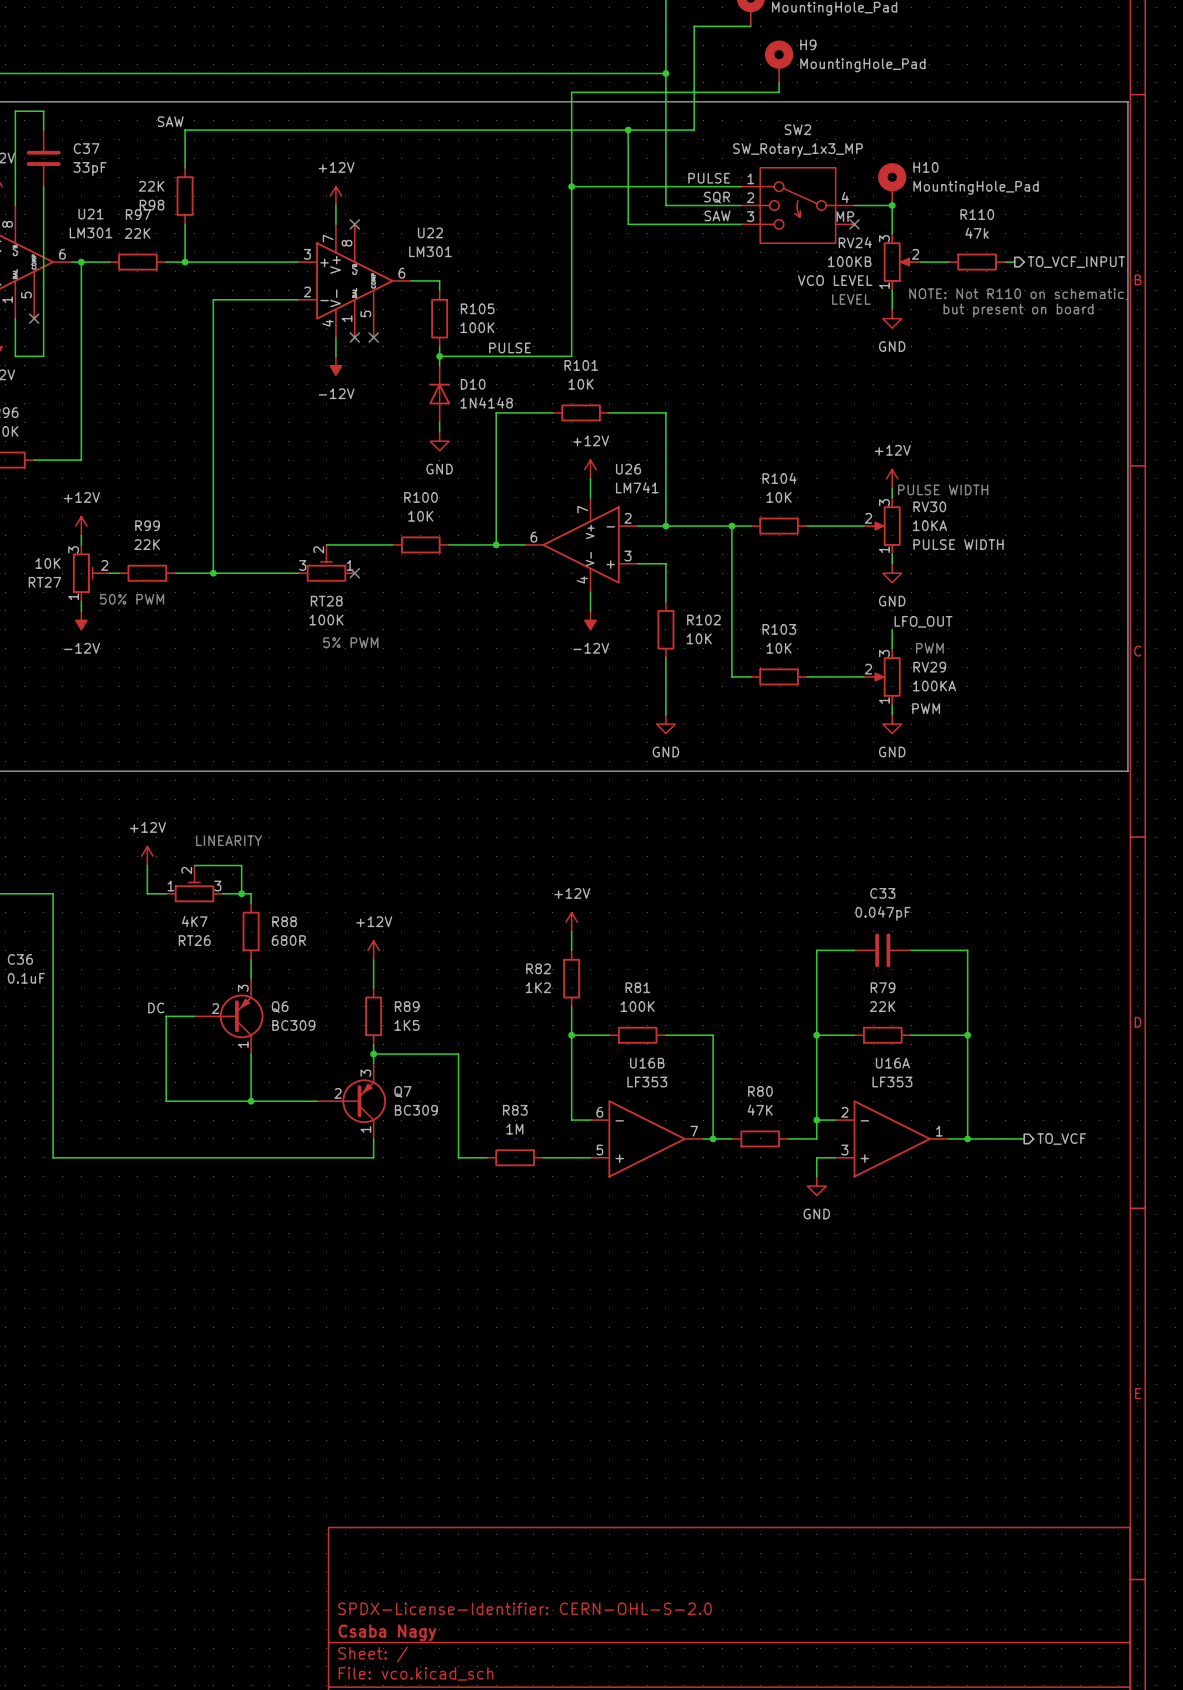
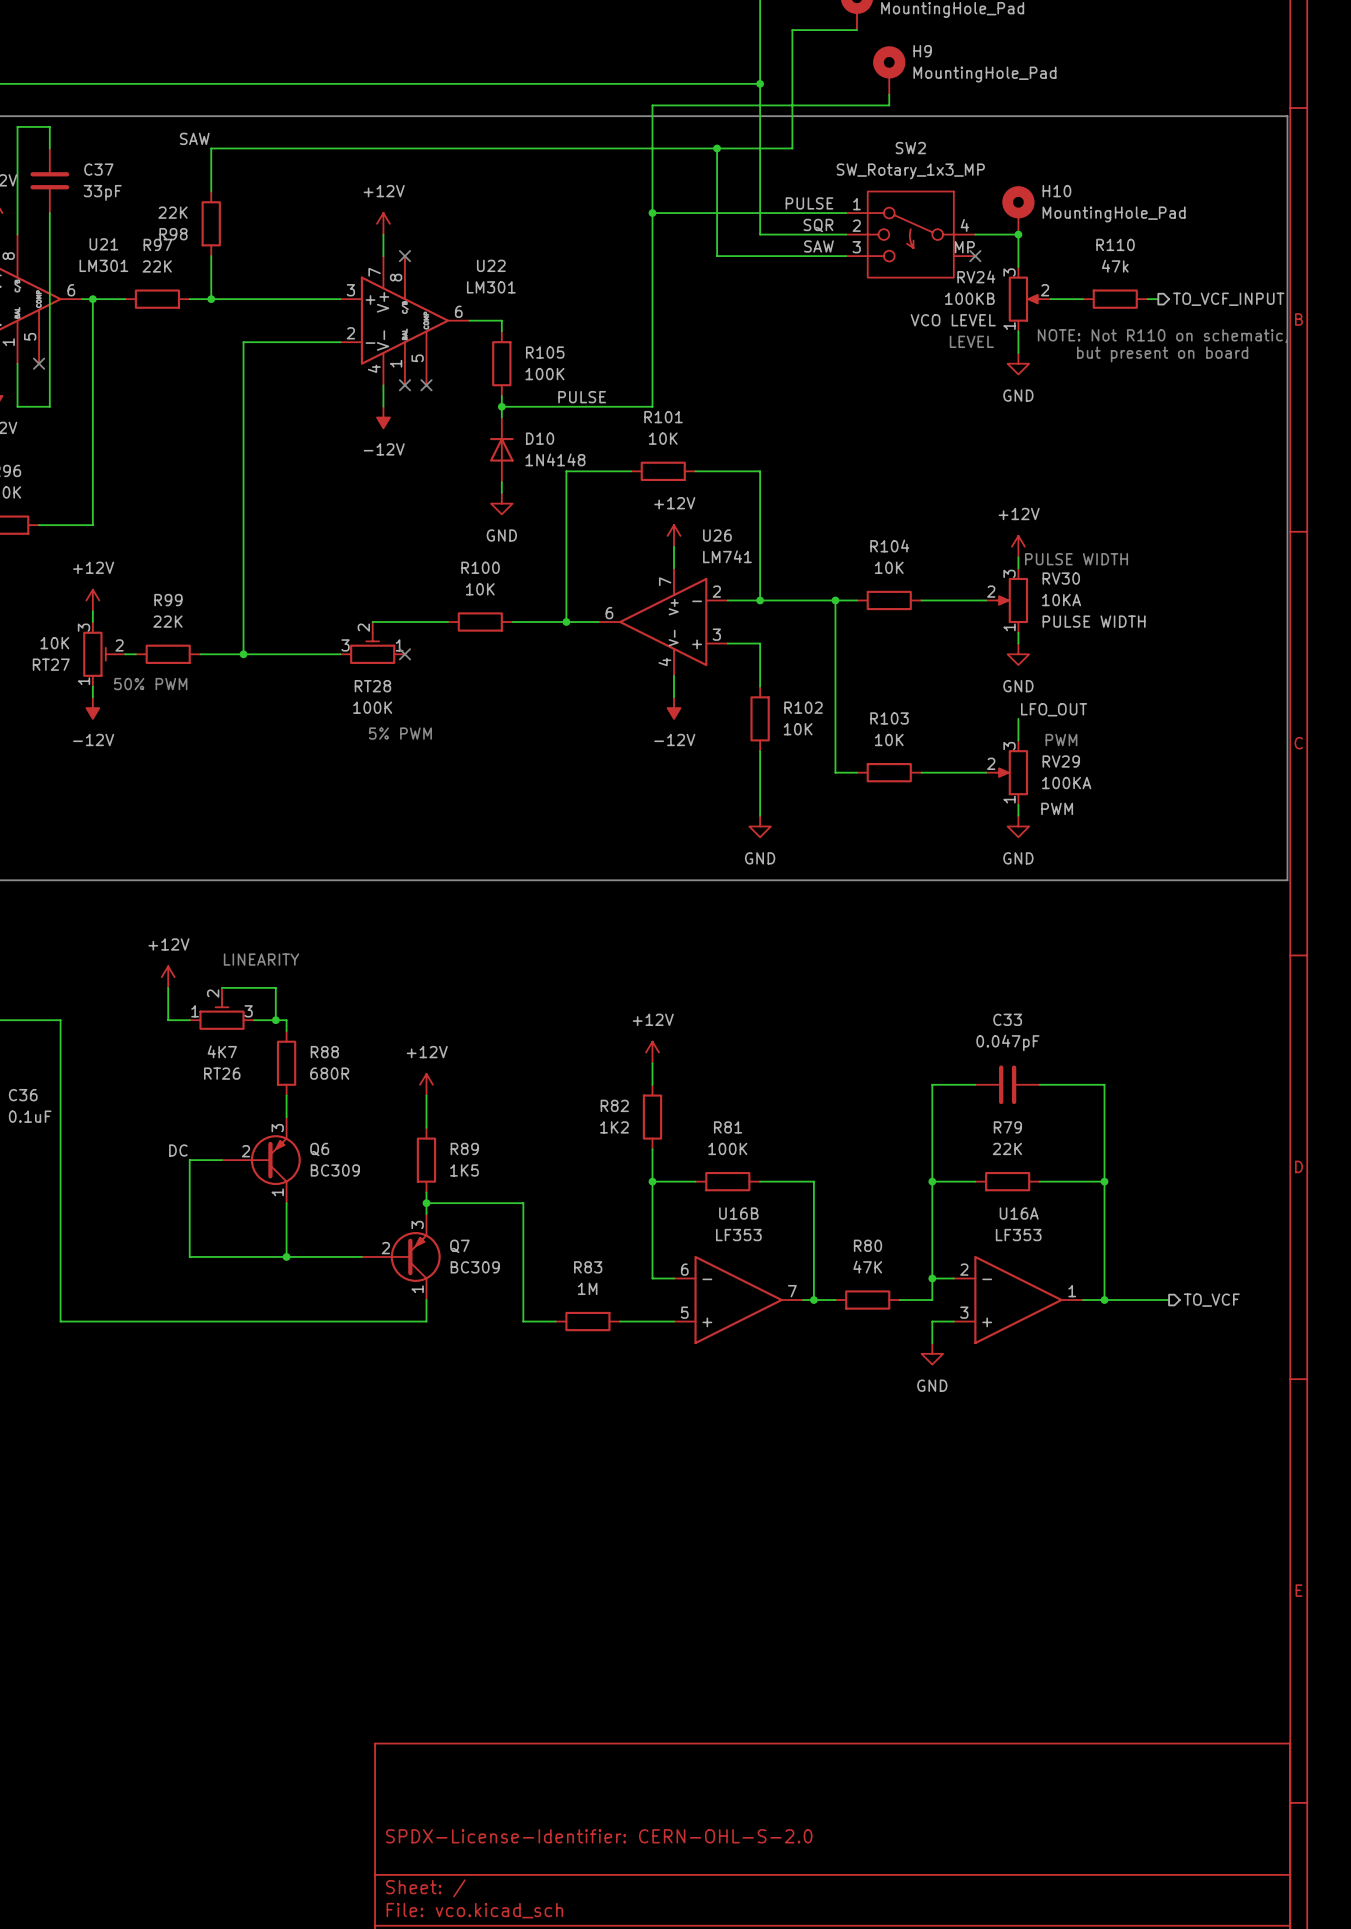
title block: Csaba Nagy (387, 1632) -> none

